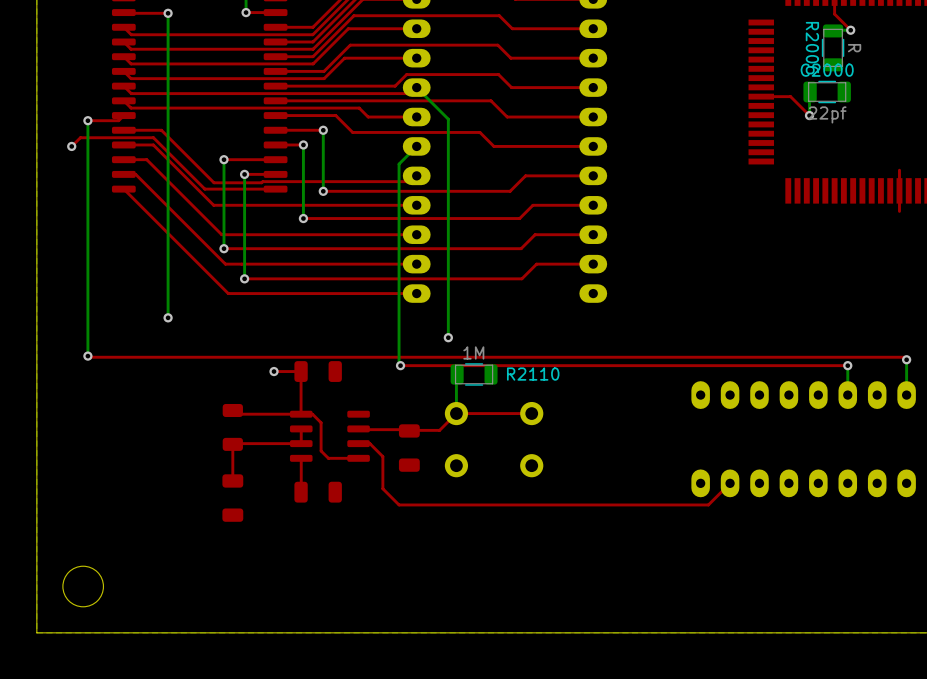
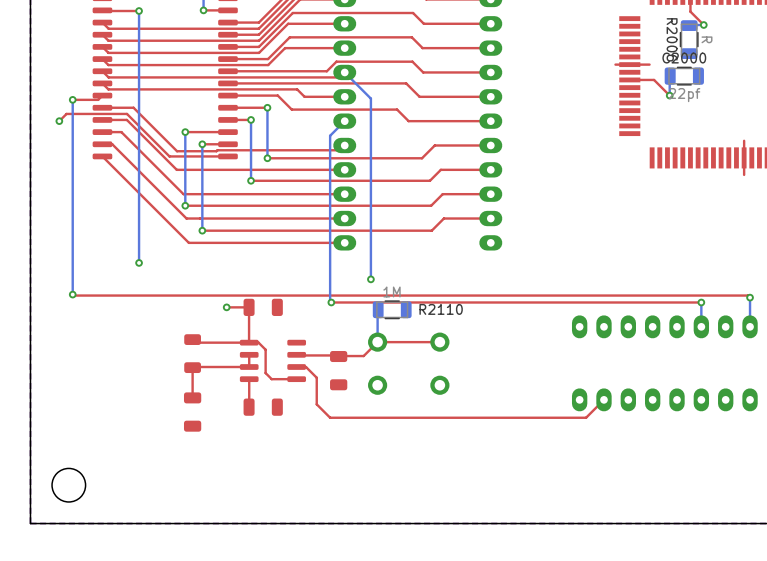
top track: none -> (649, 64) (615, 64)

